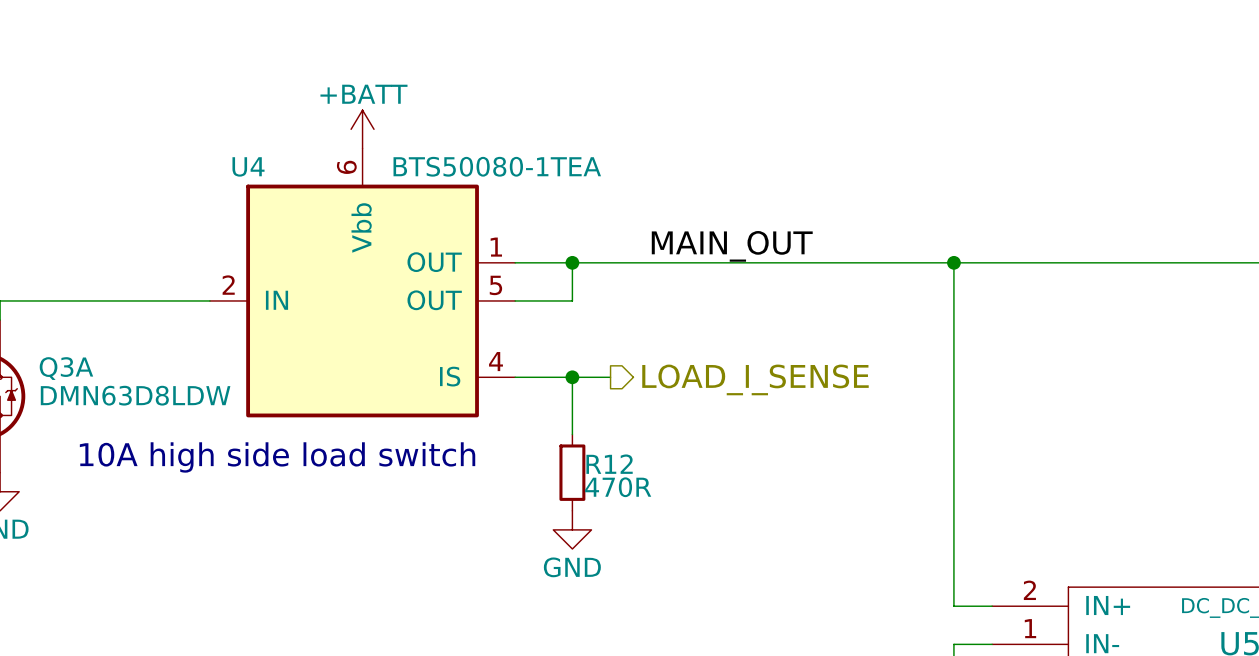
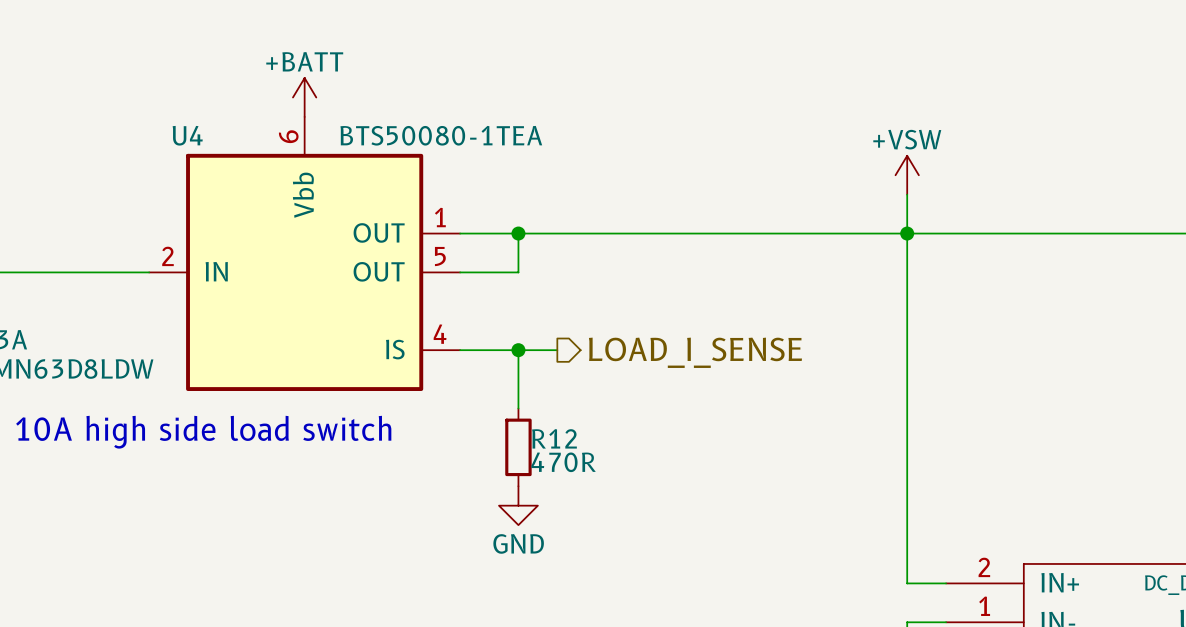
power symbol: none -> +VSW (907, 175)
wire: none -> (907, 194) (907, 233)
label: MAIN_OUT (732, 246) -> none

